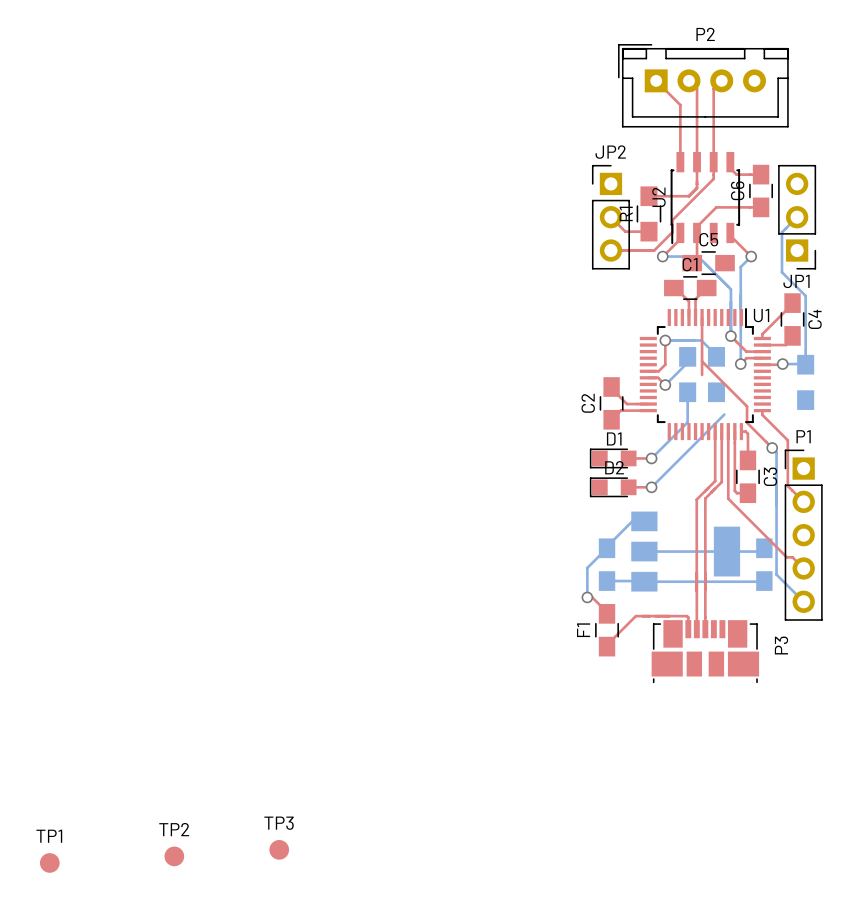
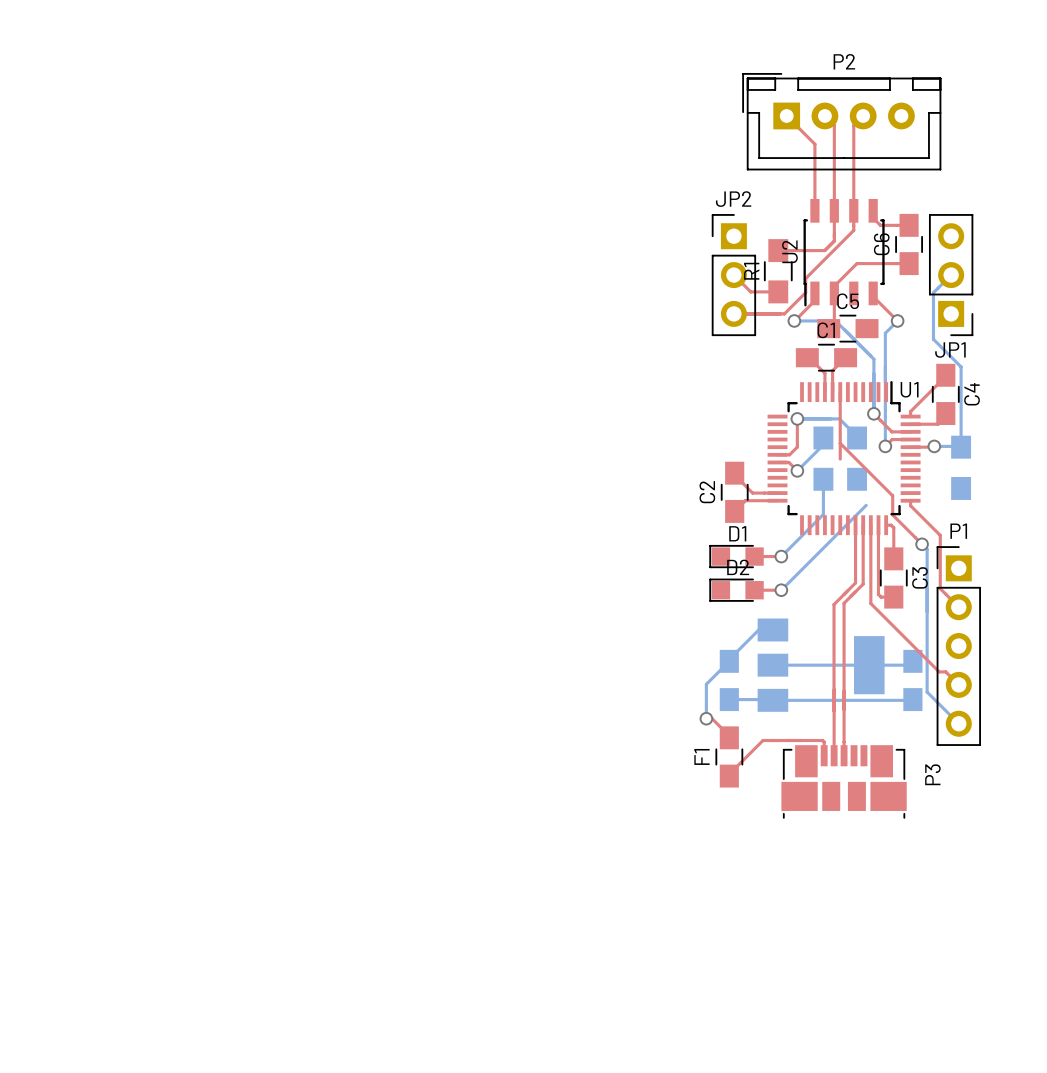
TP3: (279, 849) -> none
TP2: (174, 856) -> none
TP1: (49, 862) -> none

